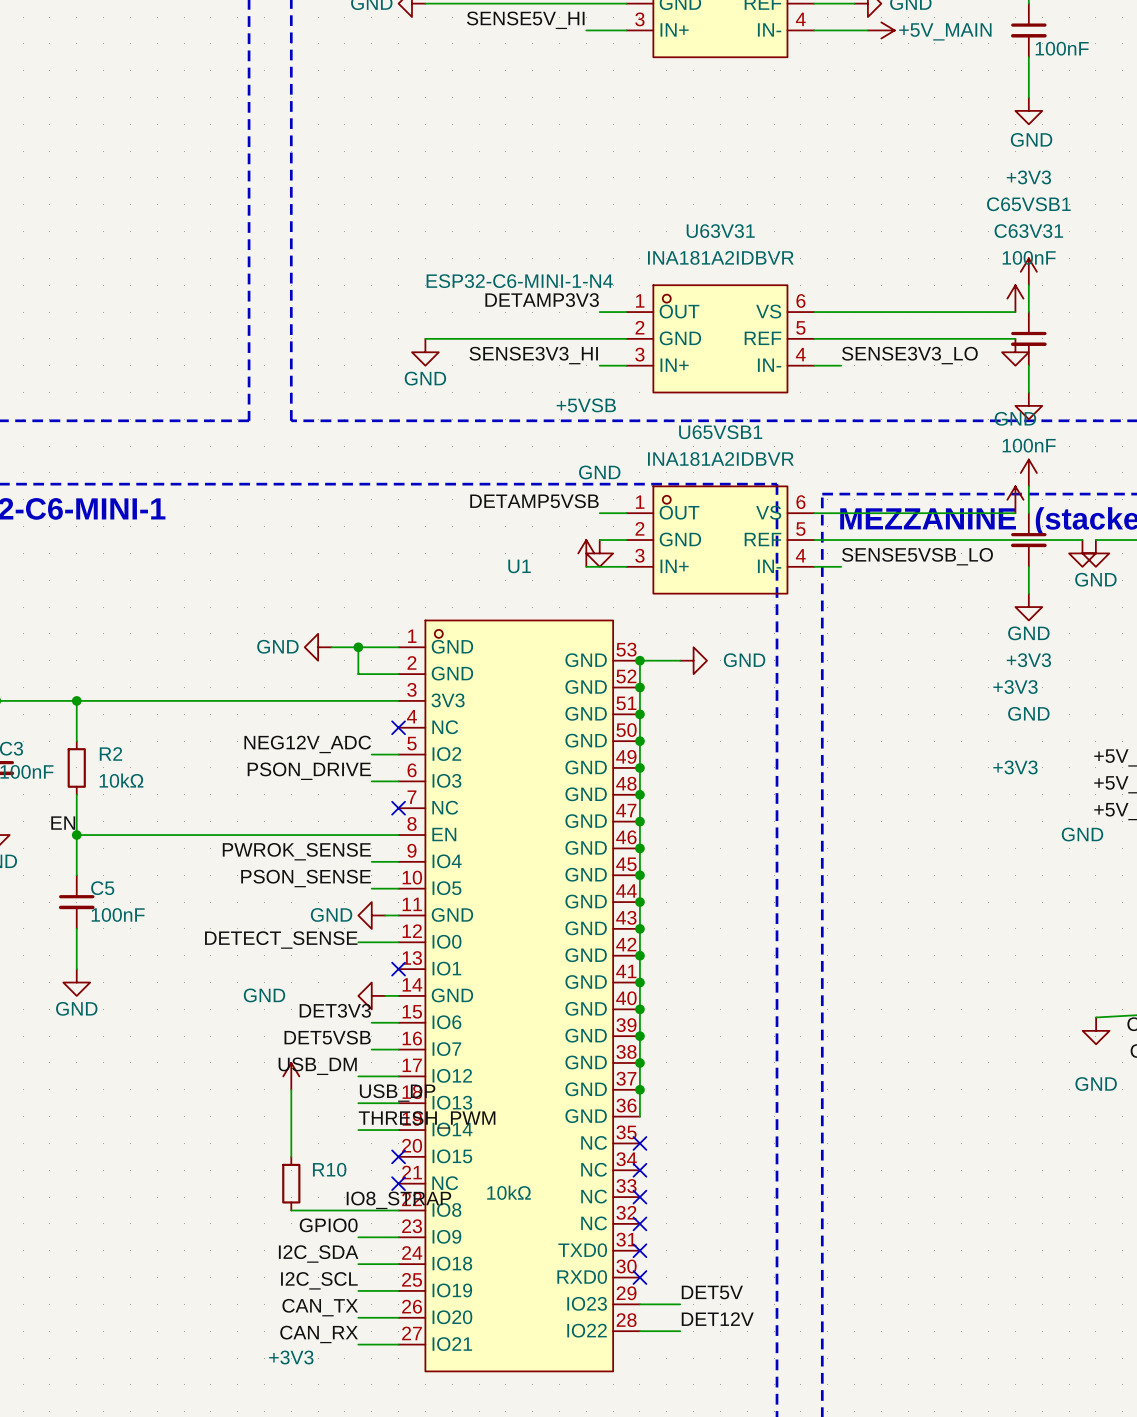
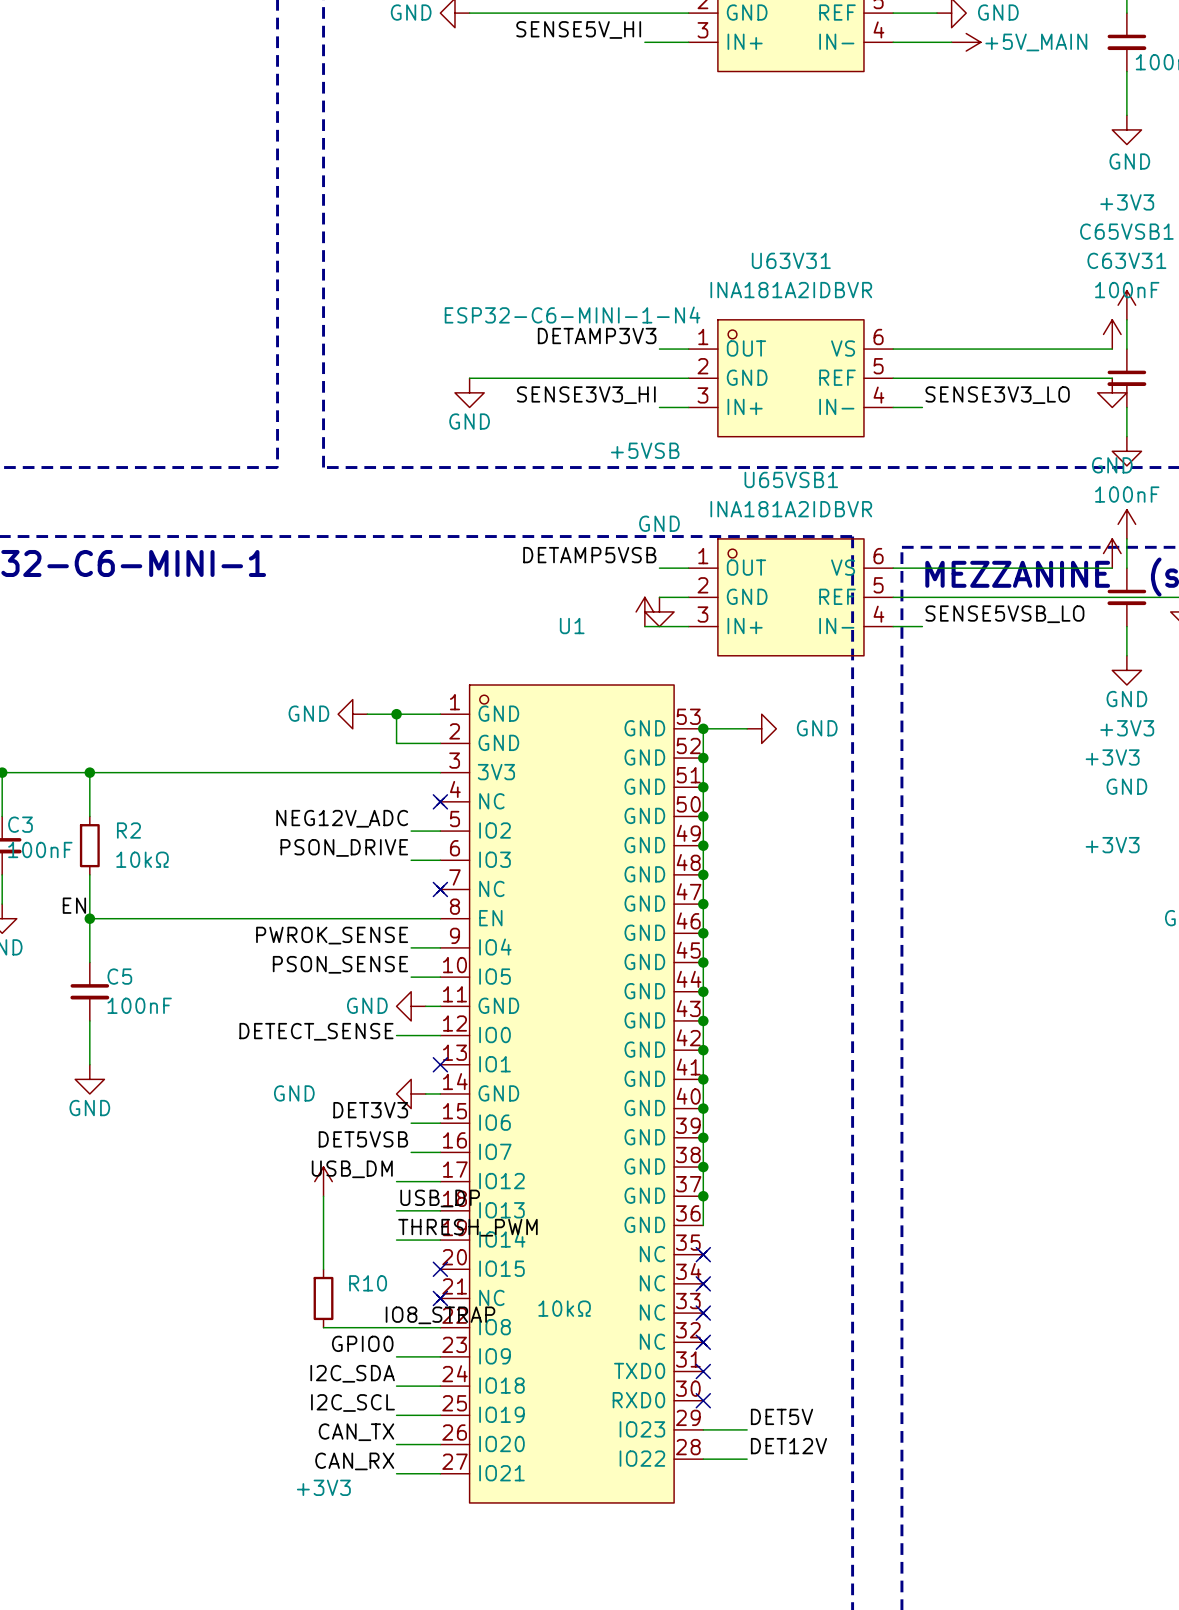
U1 symbol: [398, 620, 640, 1372] -> [436, 685, 707, 1503]

